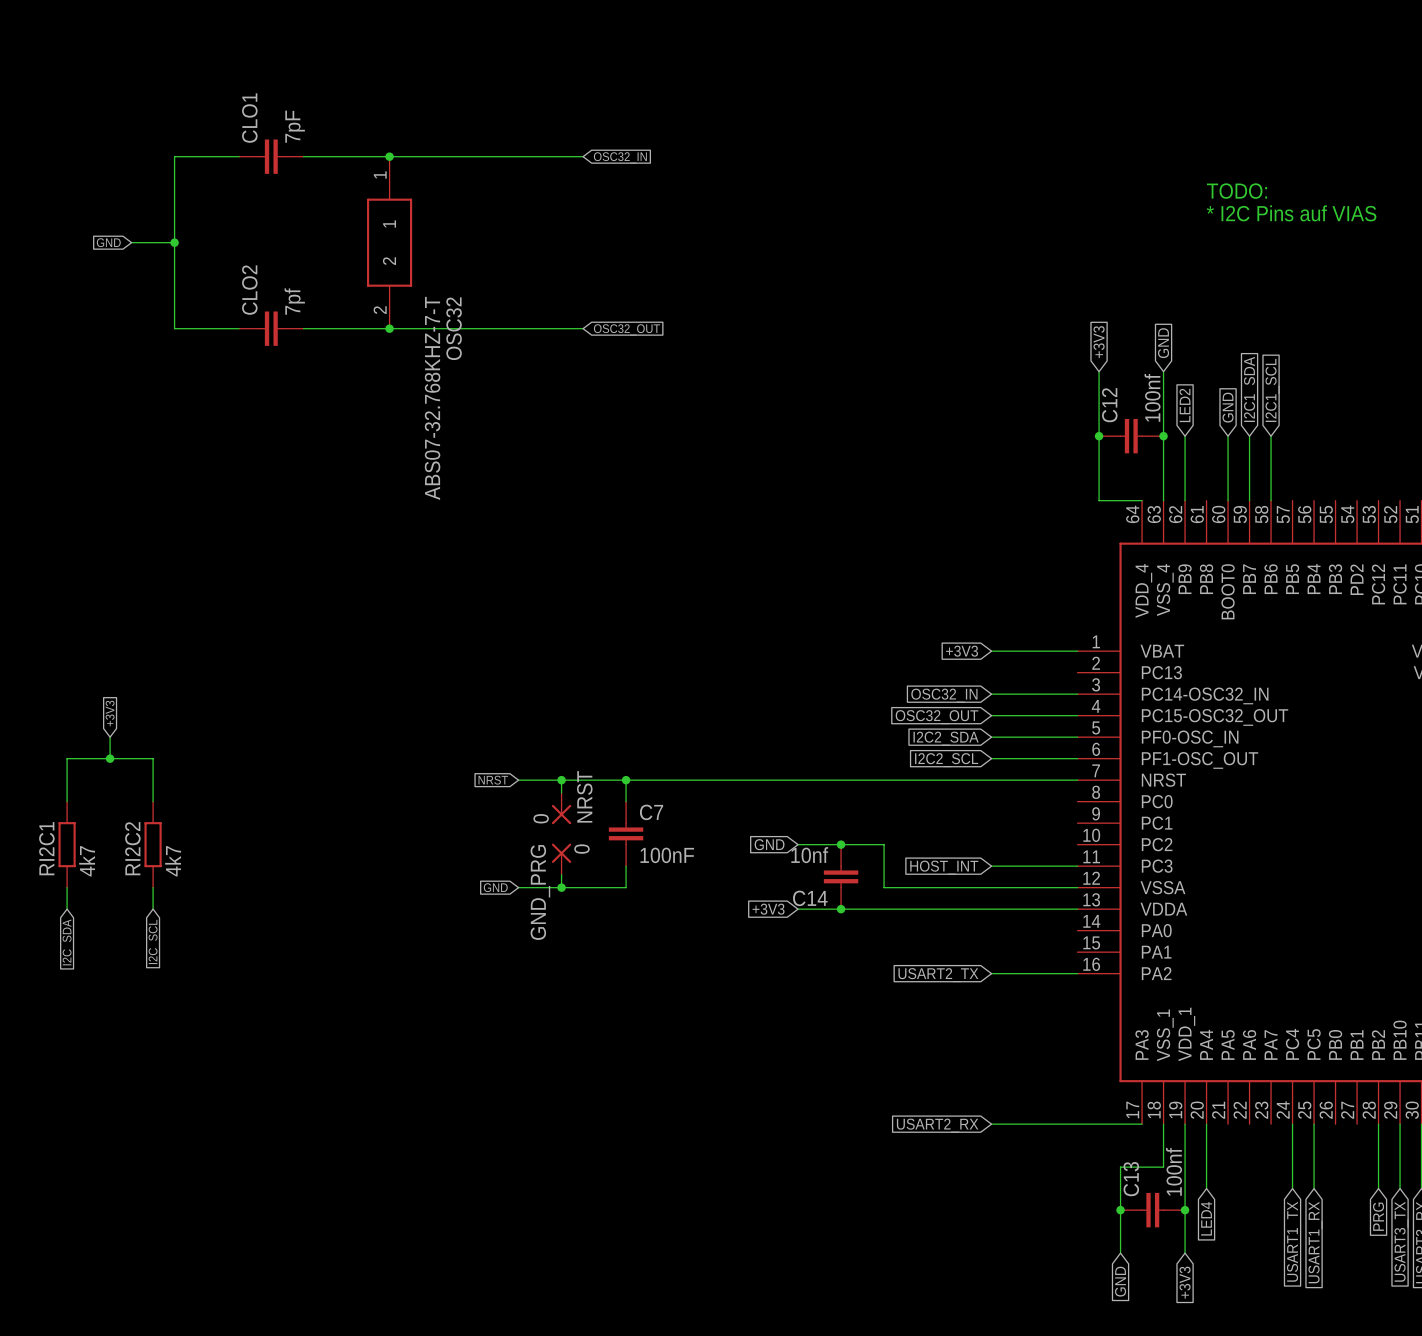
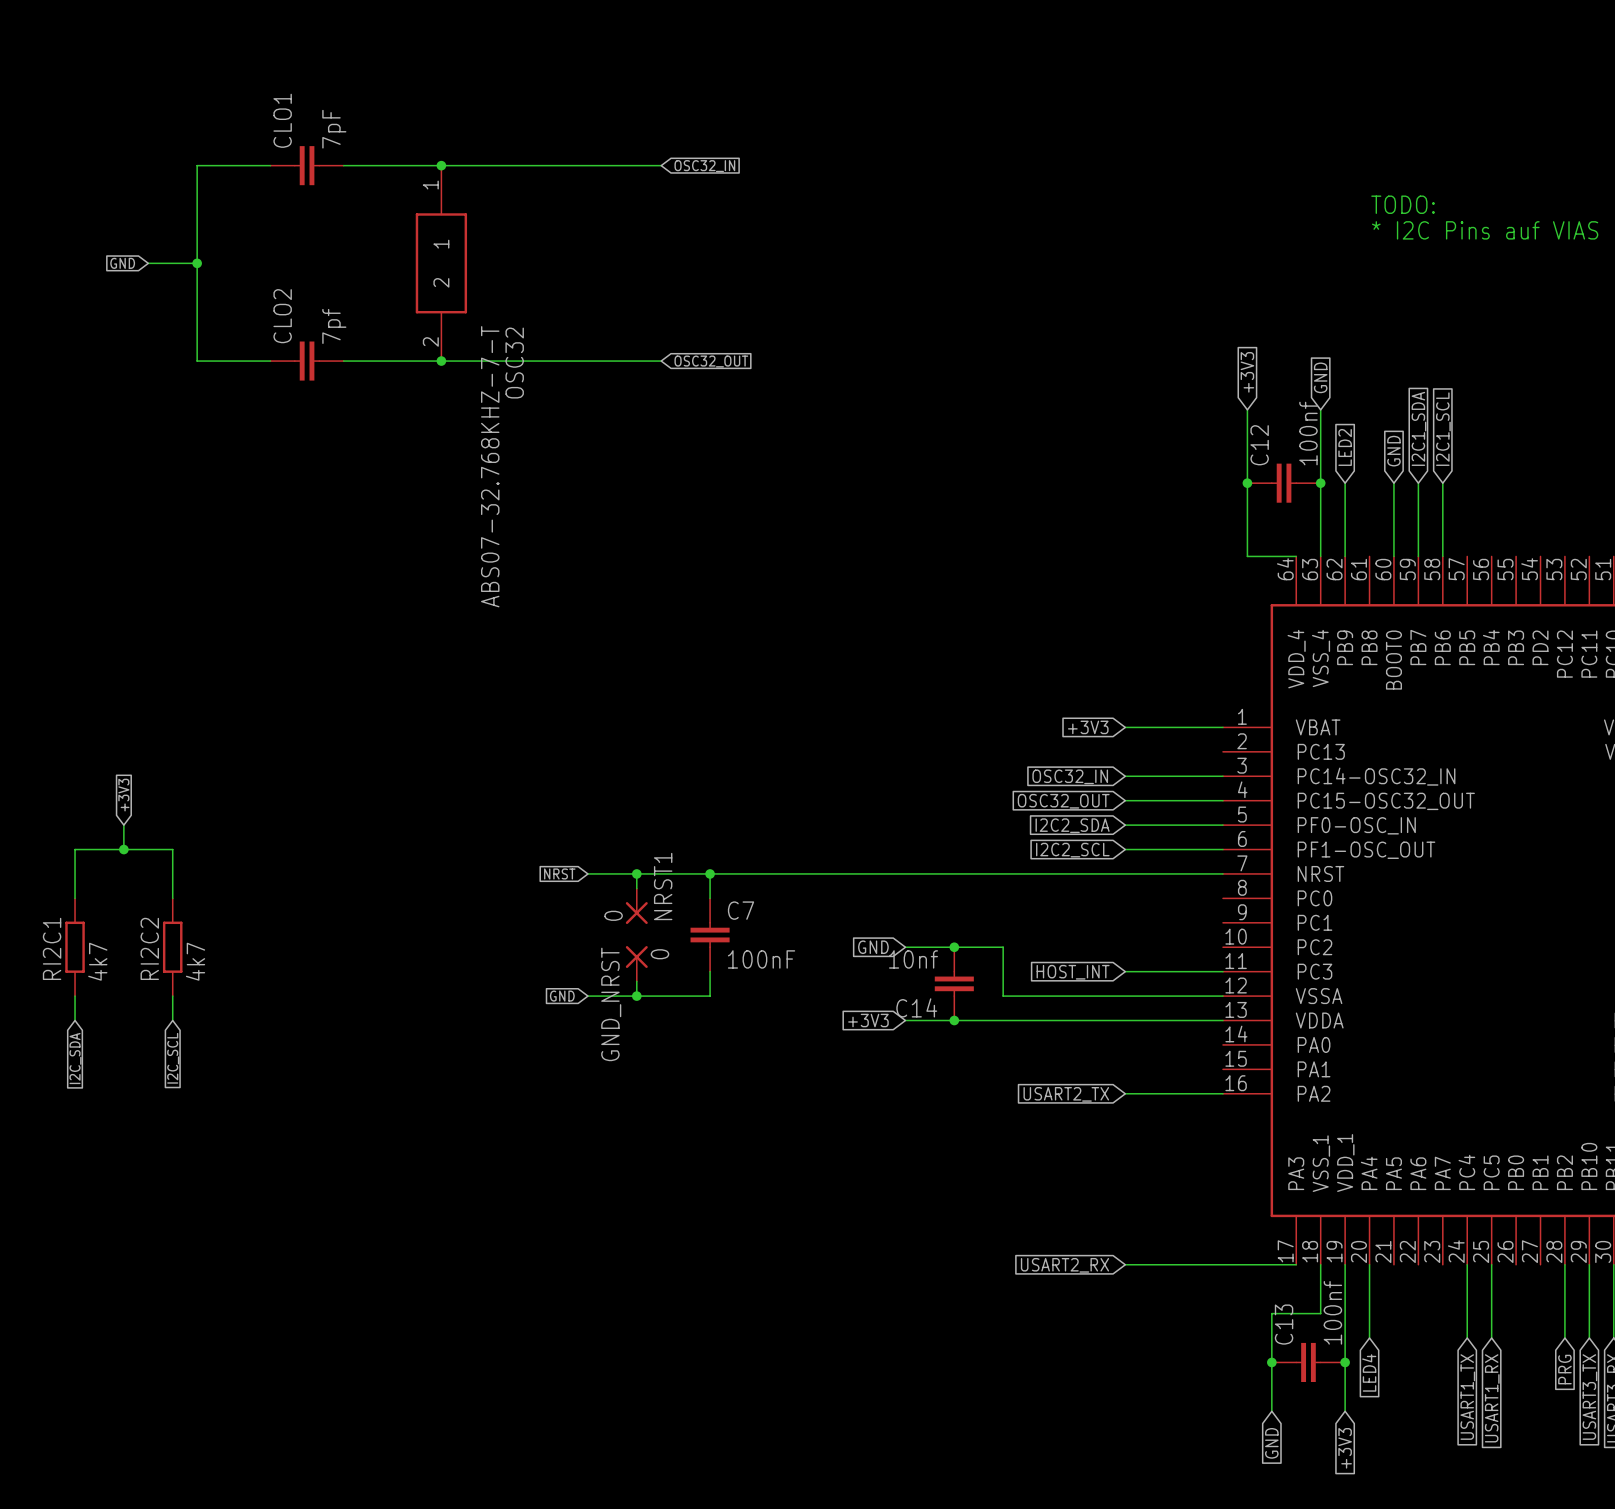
NRST name: NRST (584, 796) -> NRST1 (663, 886)
GND_PRG name: GND_PRG (540, 892) -> GND_NRST (611, 1004)

